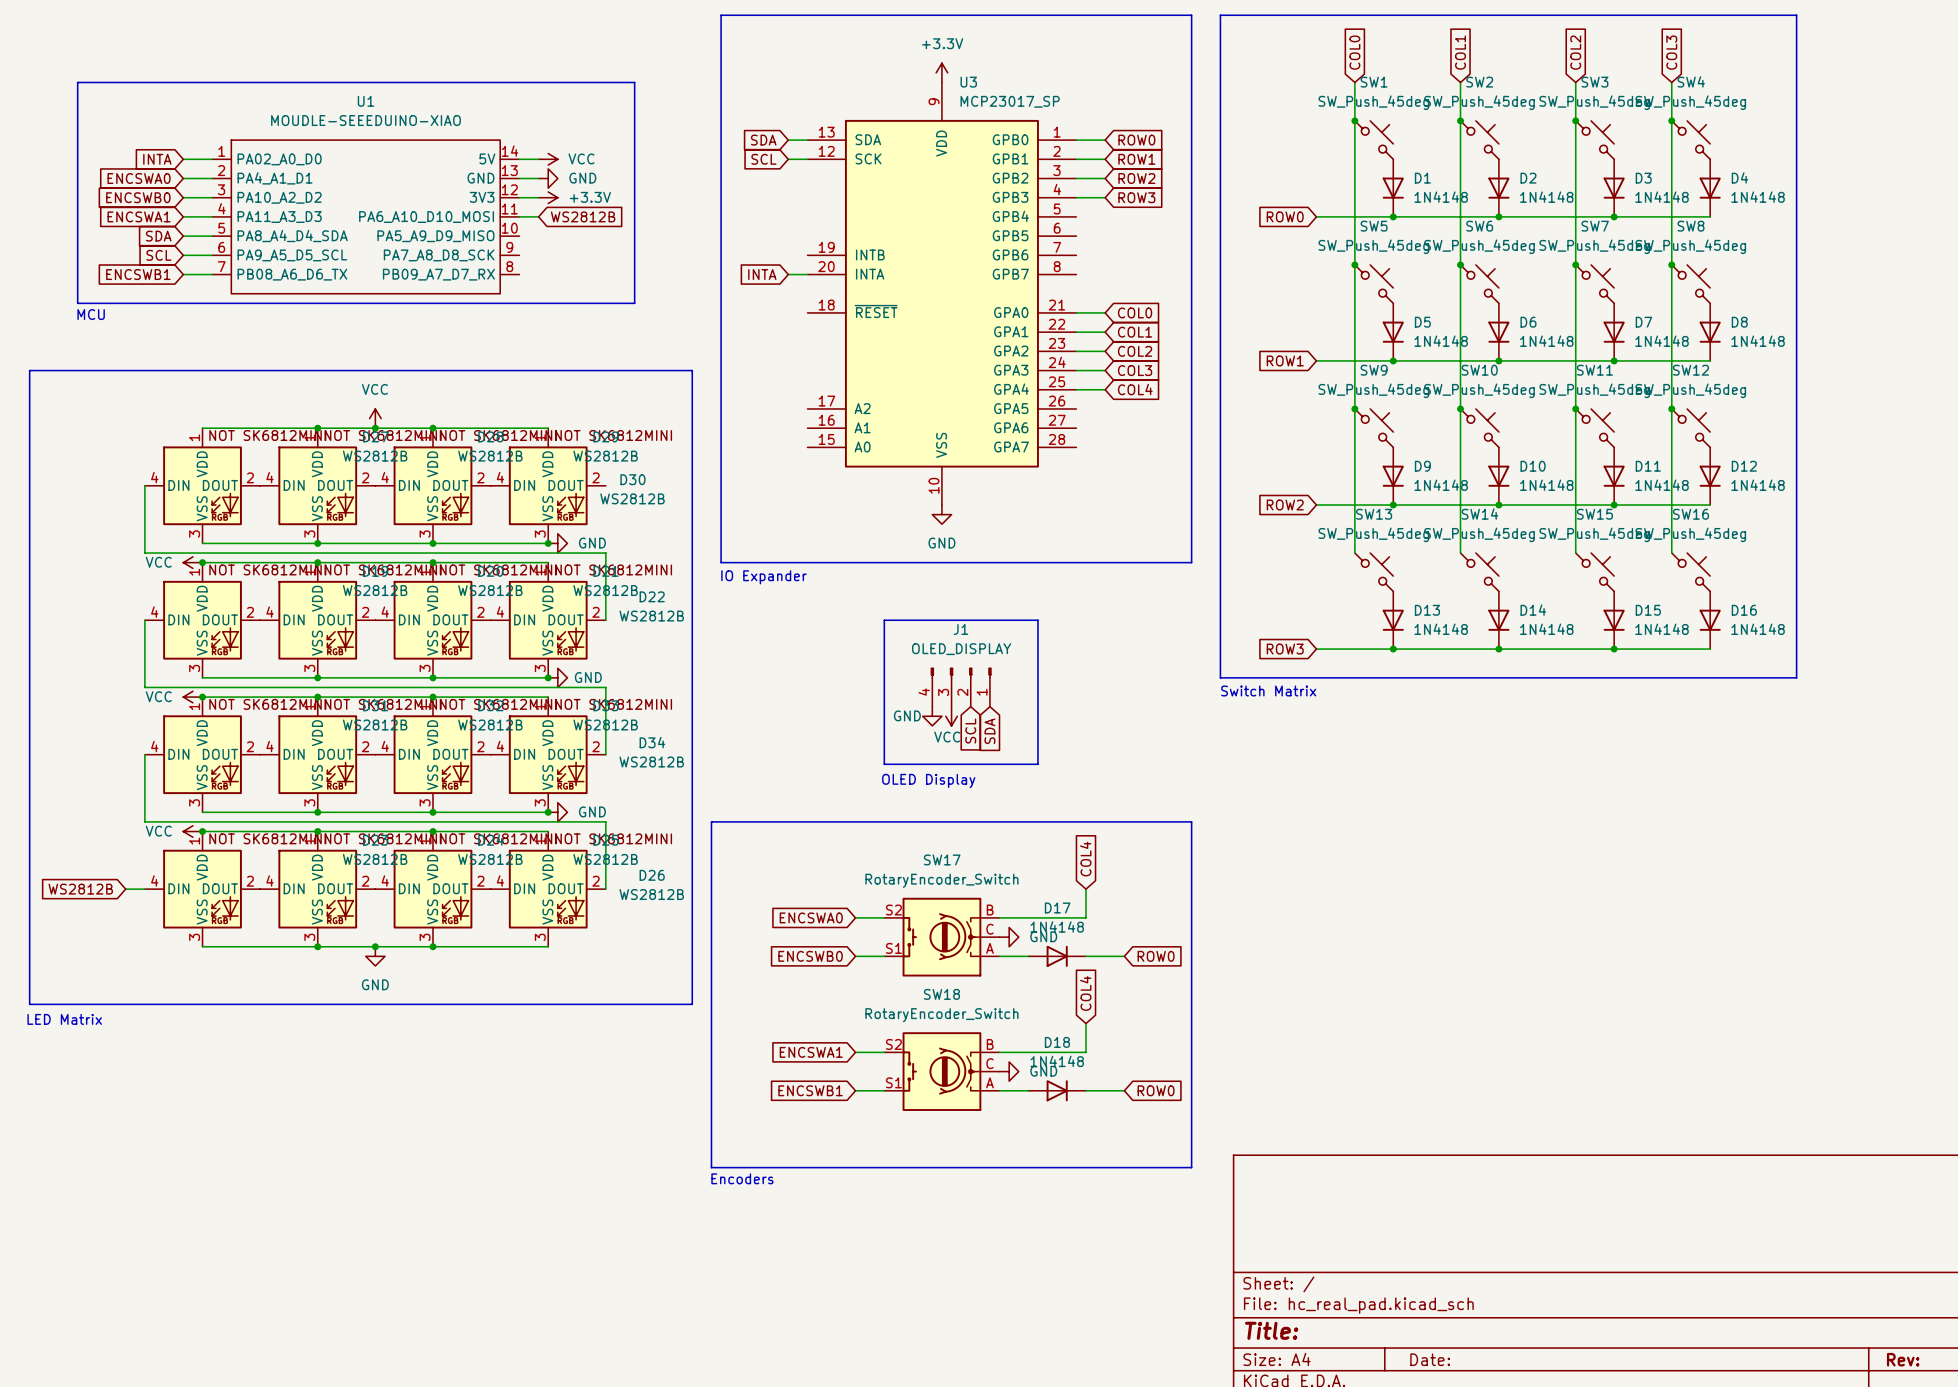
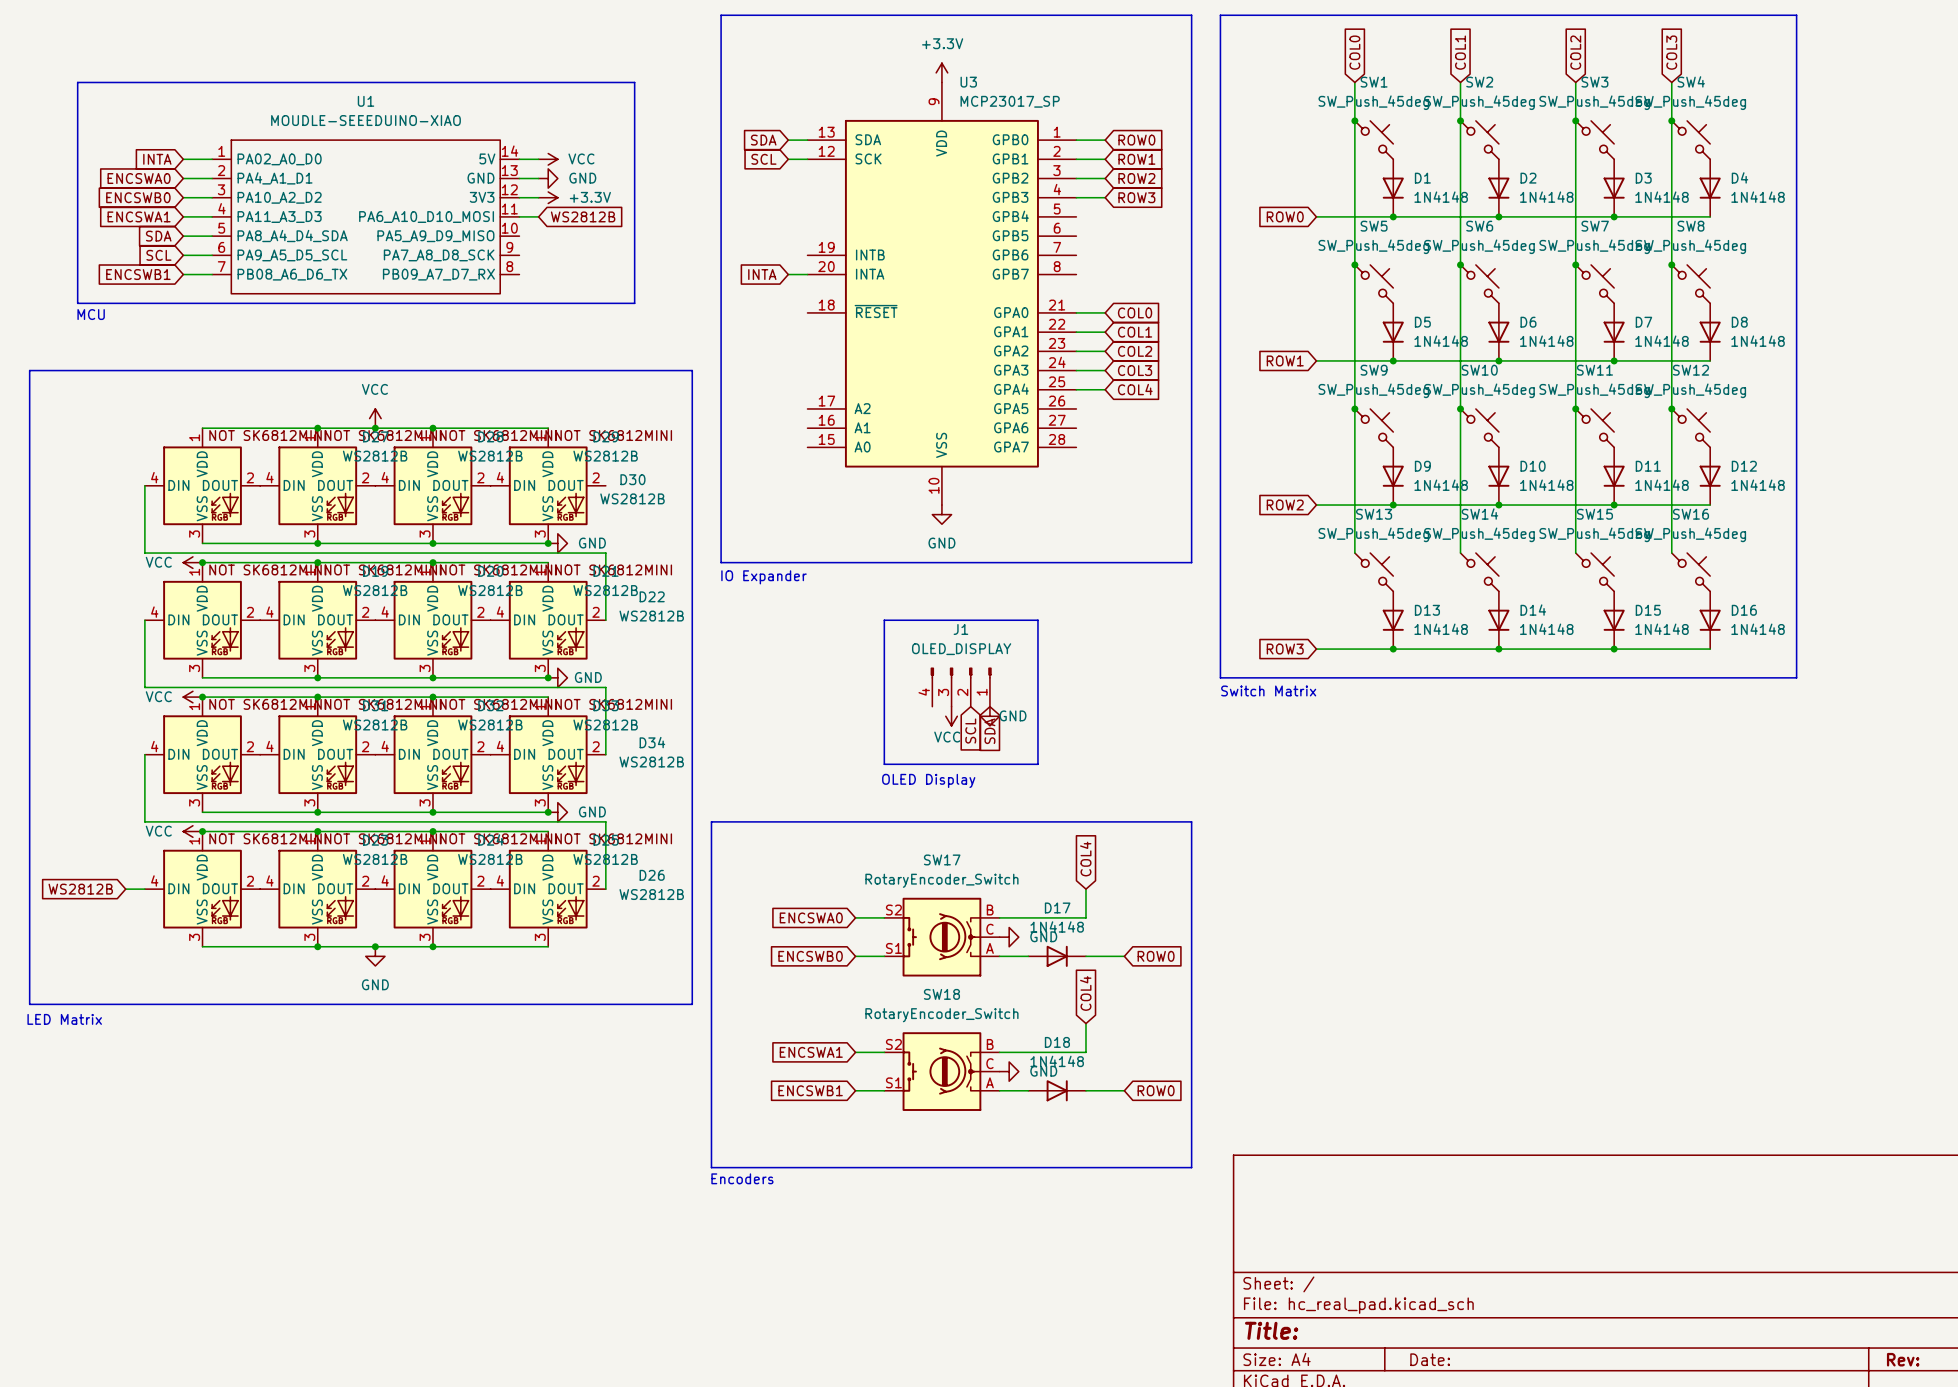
power symbol text position: GND (907, 715) -> GND (1013, 715)
power symbol position: GND (932, 716) -> GND (989, 716)

